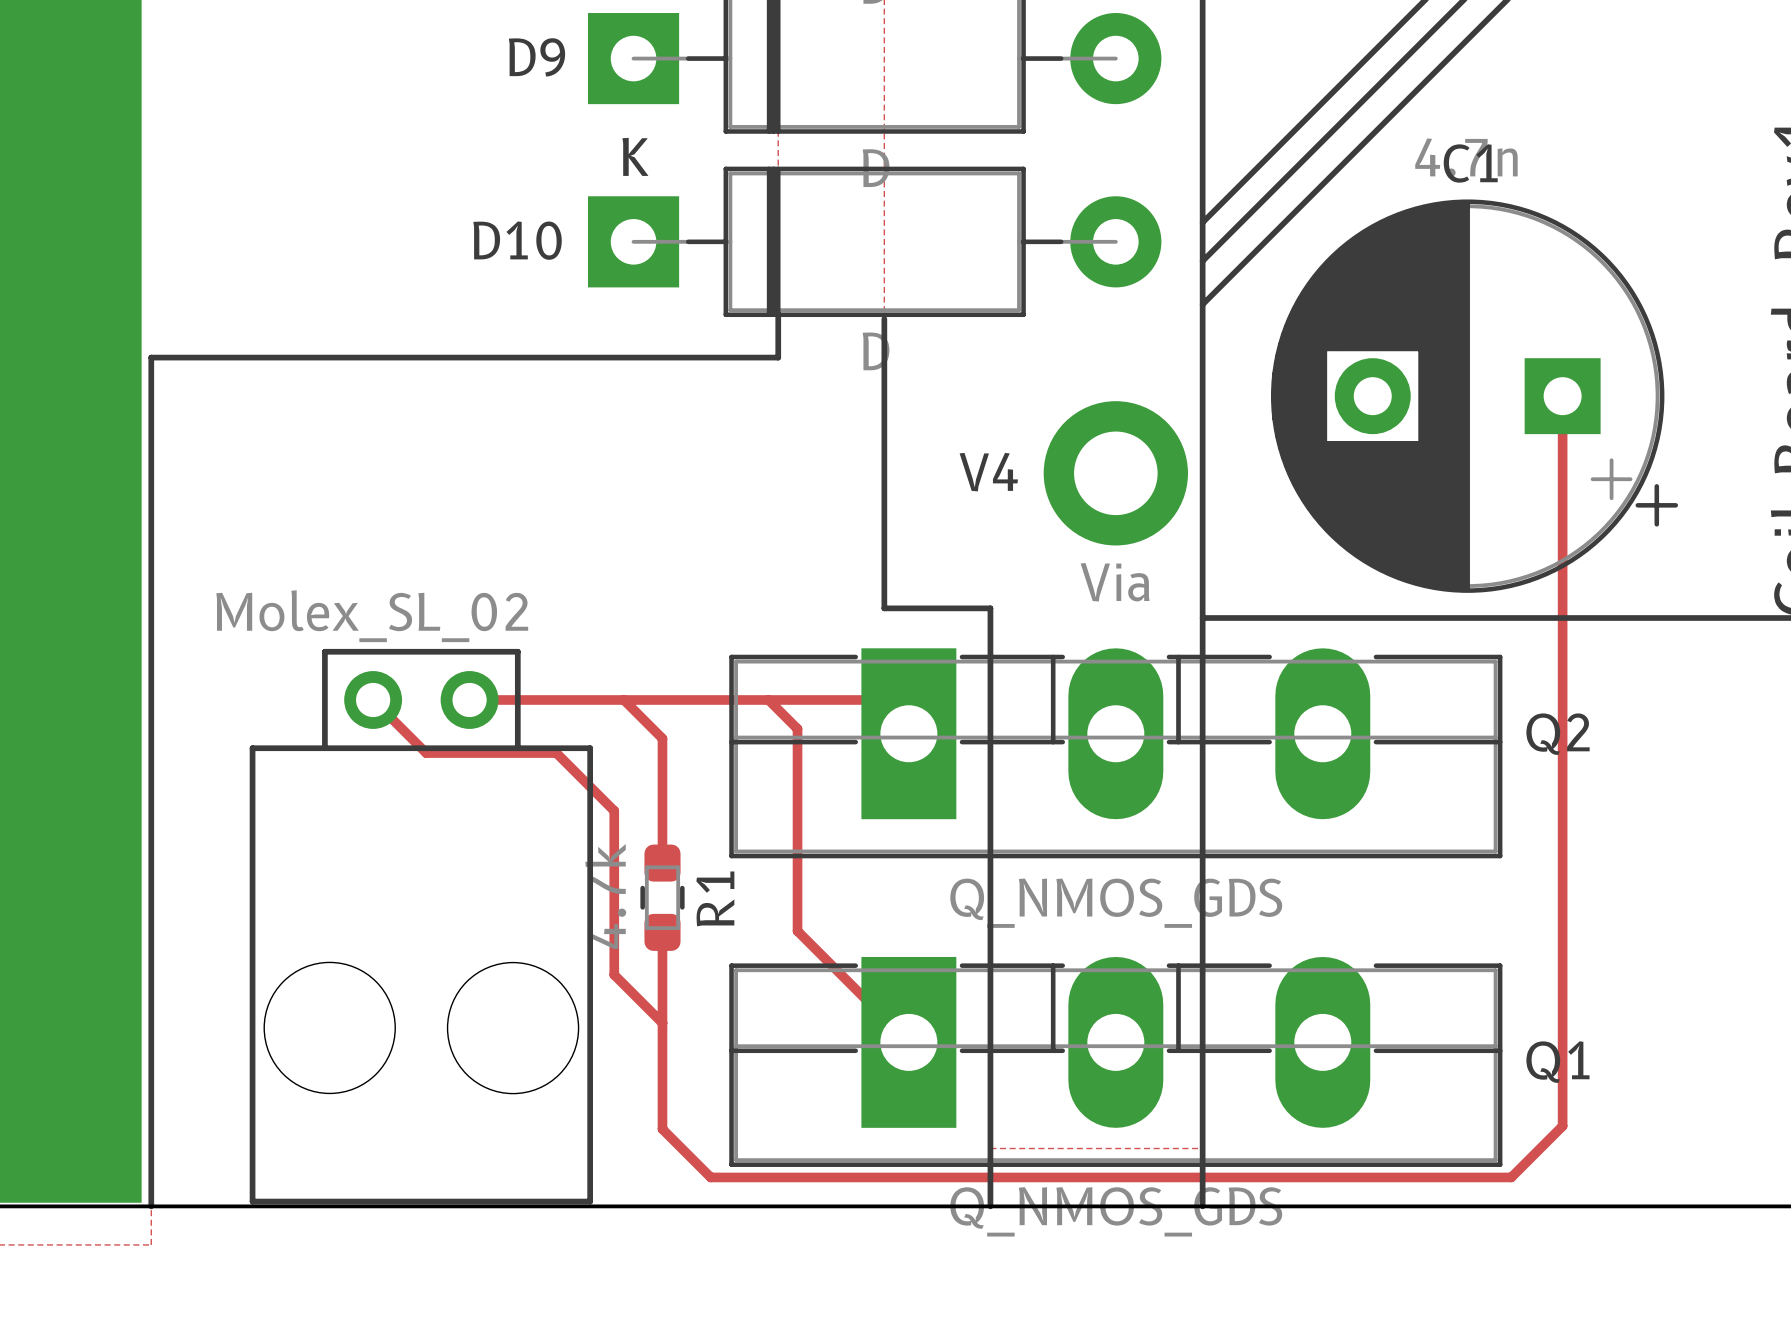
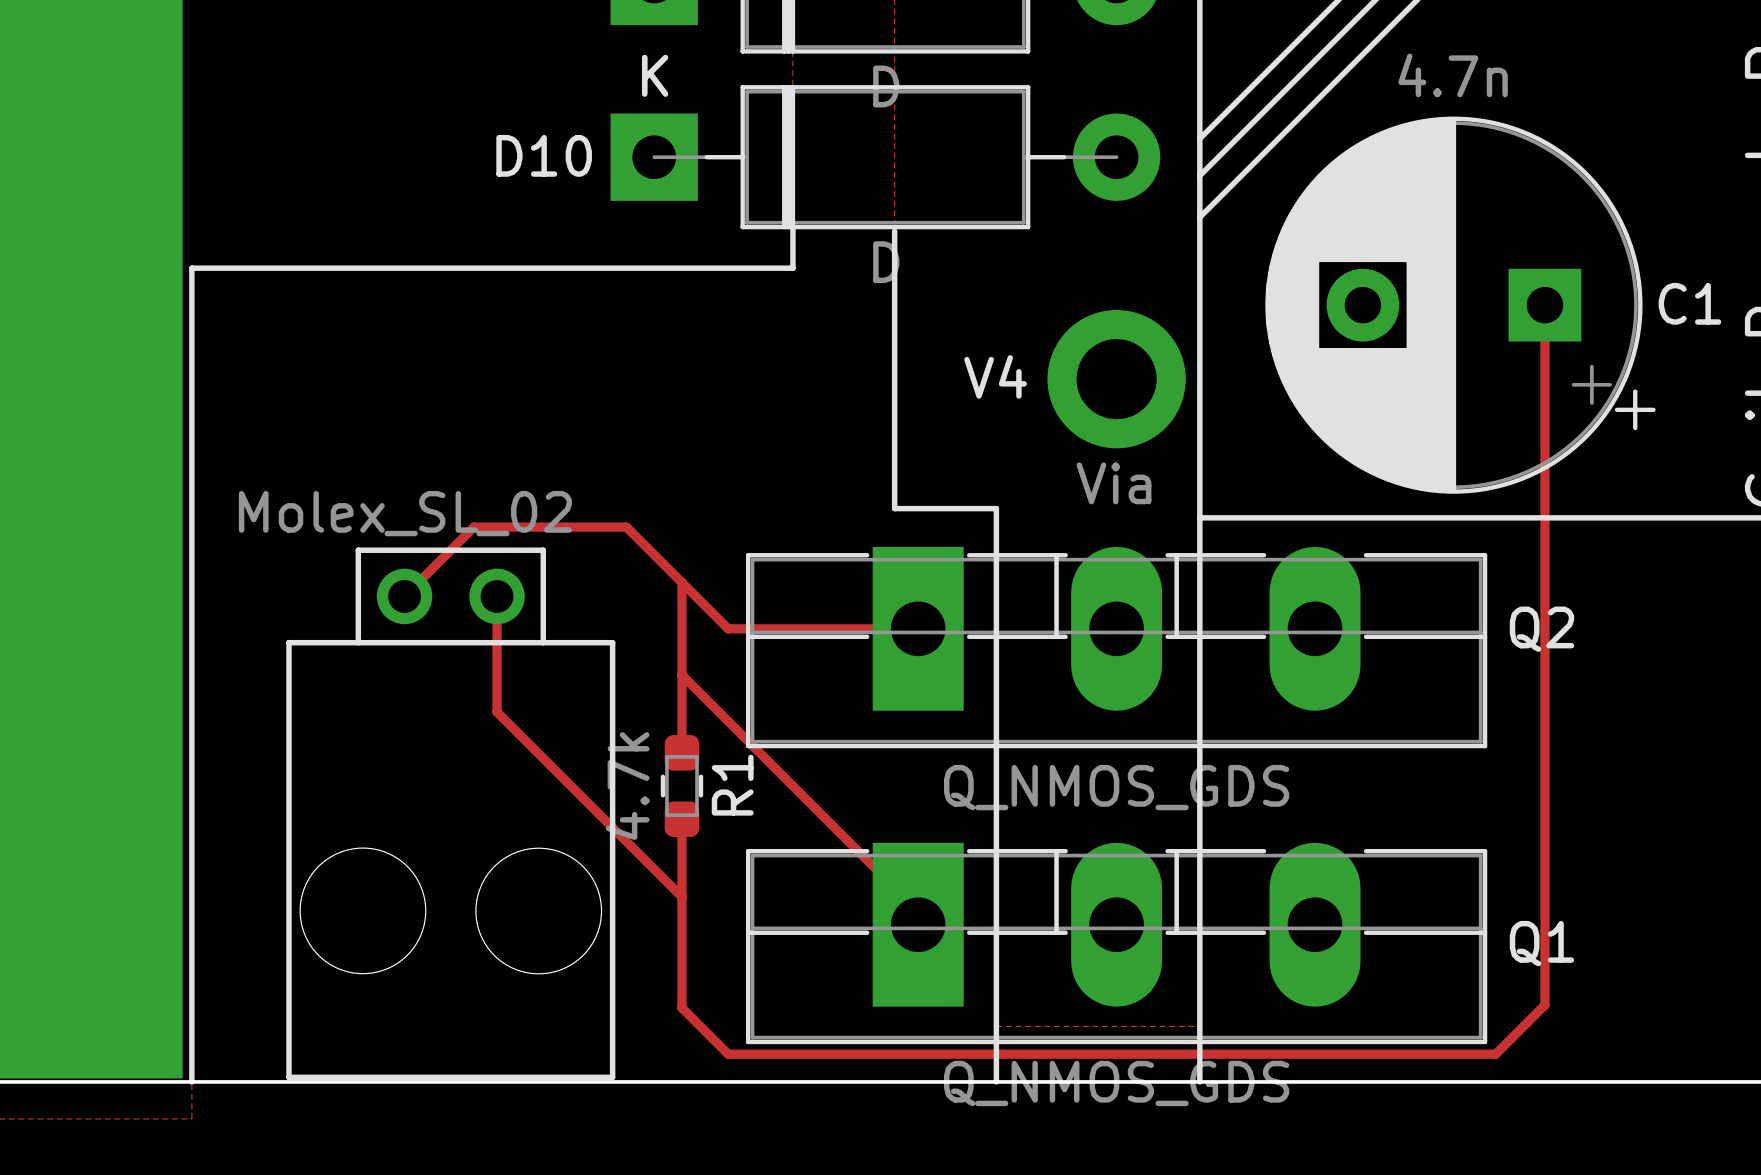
C1 name position: C1 (1470, 163) -> C1 (1689, 303)
track: (373, 699) (426, 753) (556, 753) (614, 810) (614, 974) (662, 1023) -> none
track: (469, 699) (875, 699) (908, 733) -> (404, 596) (473, 527) (626, 527) (728, 628) (918, 628)
track: none -> (497, 596) (497, 712) (681, 897)
track: (623, 699) (662, 738) -> (681, 582) (681, 633)
track: (768, 699) (797, 728) (797, 931) (908, 1042) -> (681, 675) (918, 911) (918, 924)

